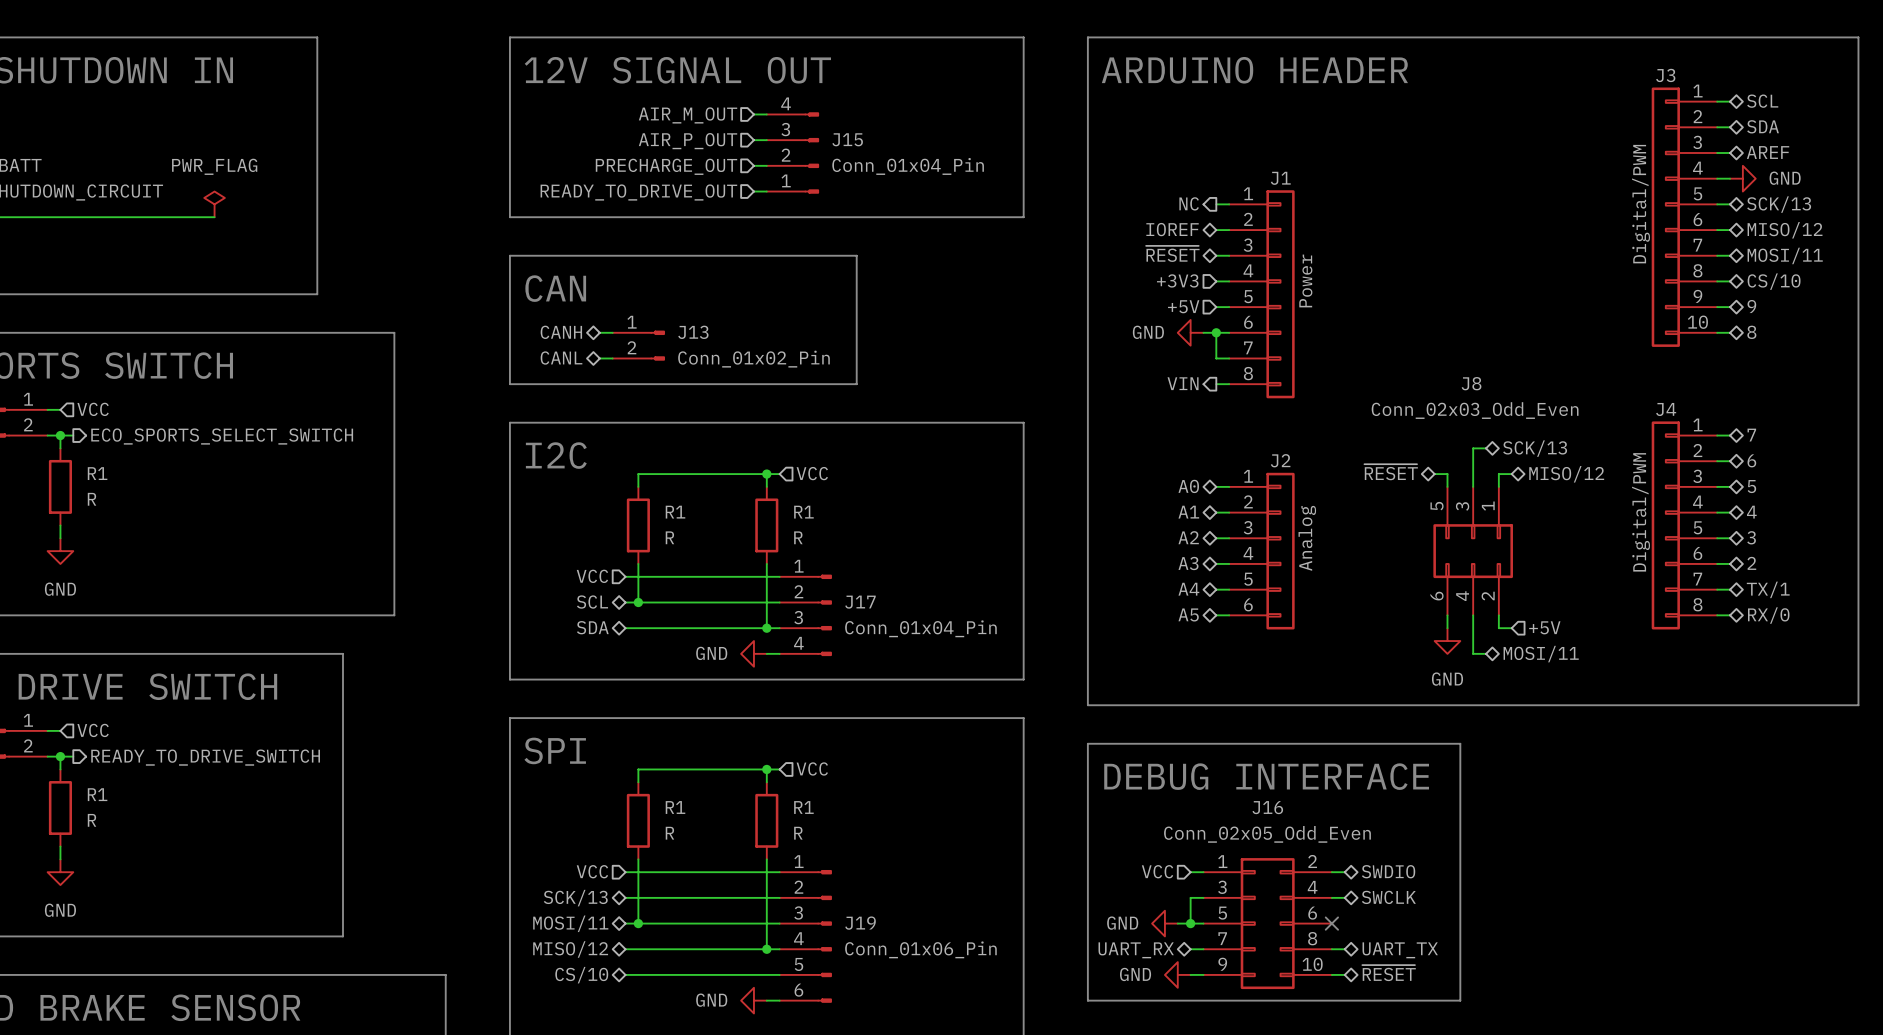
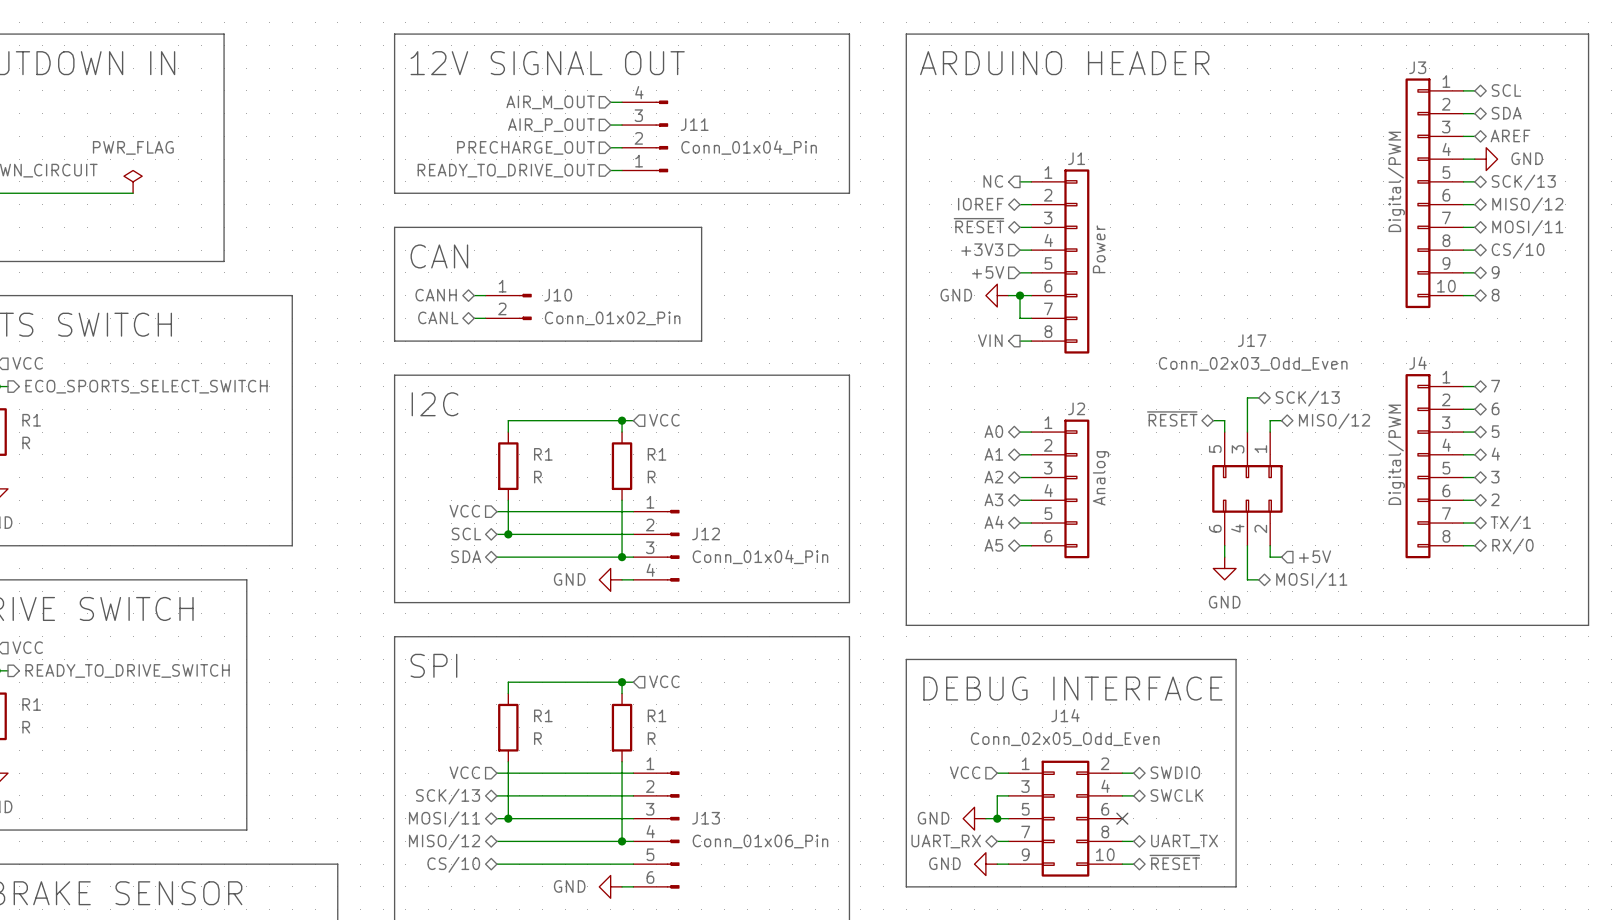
J15 name: J15 (847, 139) -> J11 (694, 124)
J13 name: J13 (693, 332) -> J10 (558, 295)
J8 name: J8 (1471, 383) -> J17 (1252, 340)
J17 name: J17 (860, 602) -> J12 (706, 533)
J16 name: J16 (1267, 807) -> J14 (1065, 715)
J19 name: J19 (860, 923) -> J13 (706, 818)

